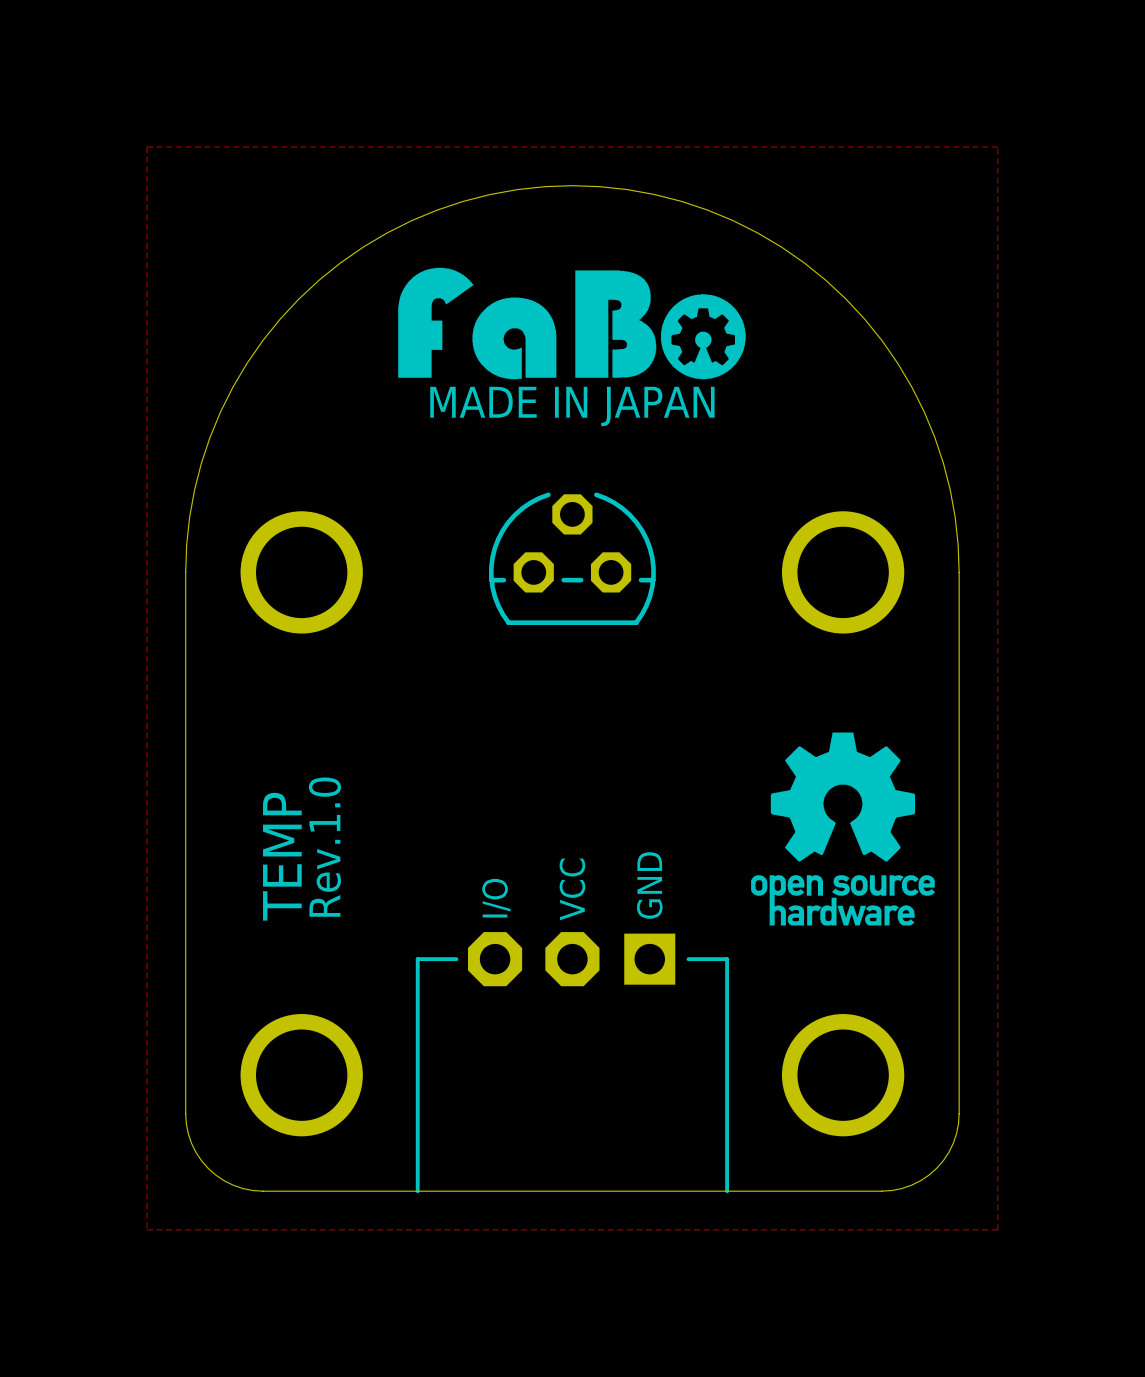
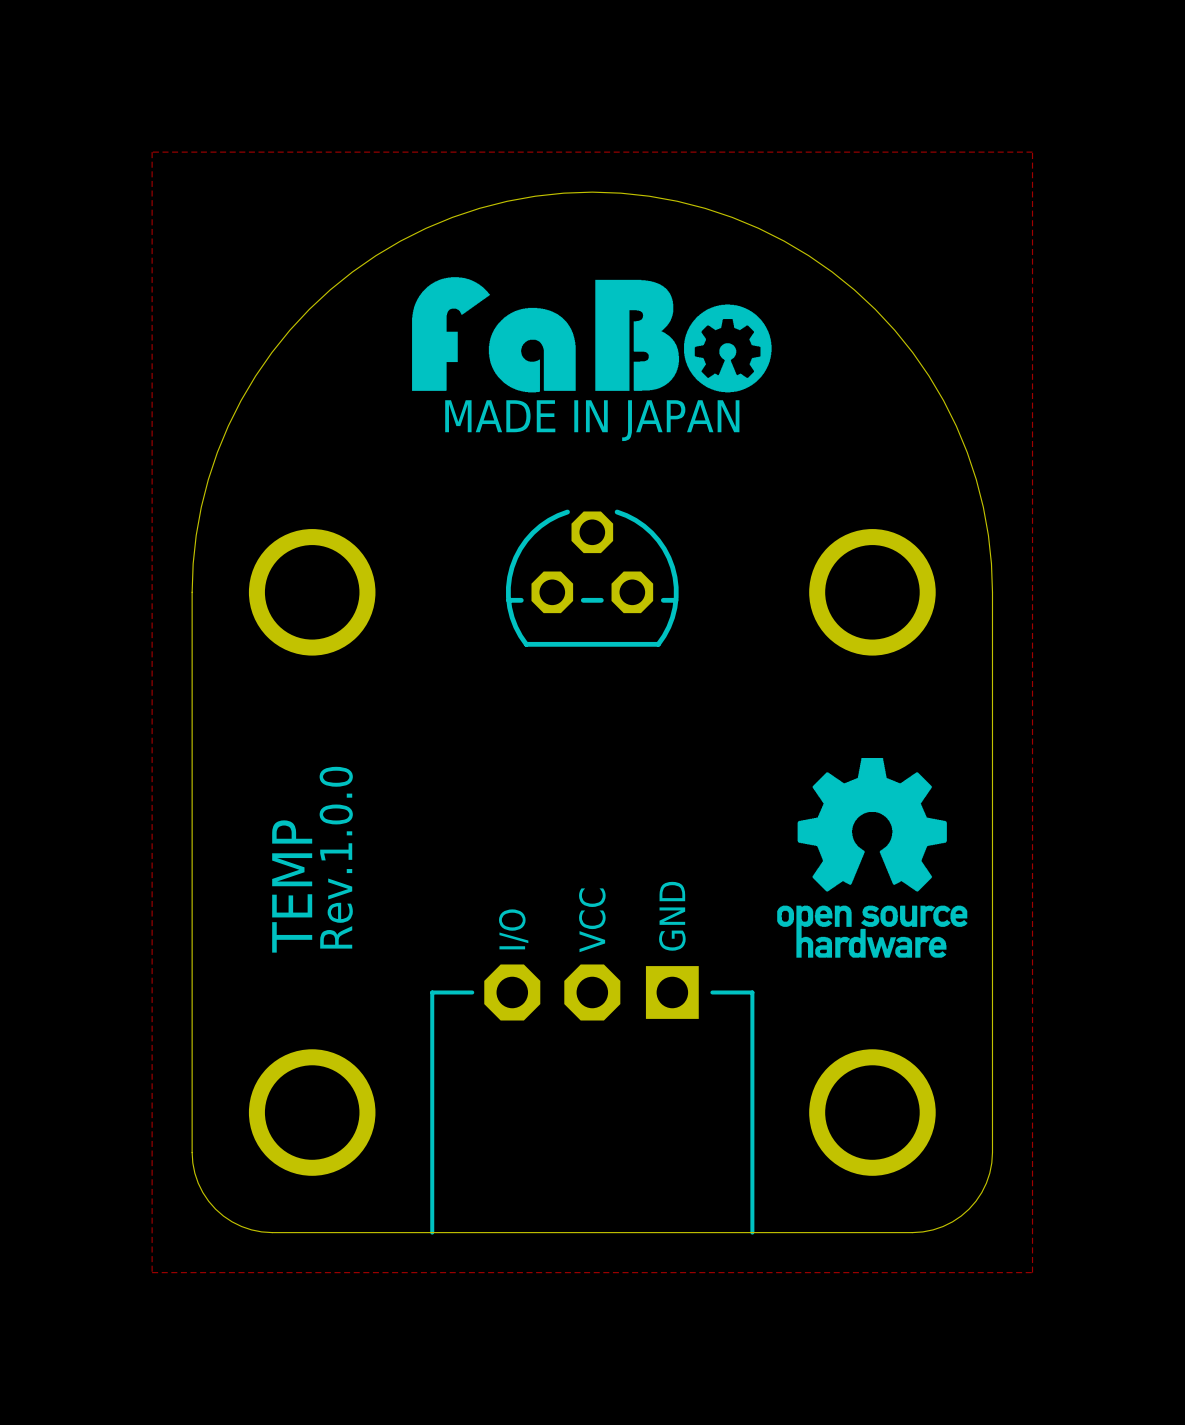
text: Rev.1.0 (324, 847) -> Rev.1.0.0 (336, 857)

